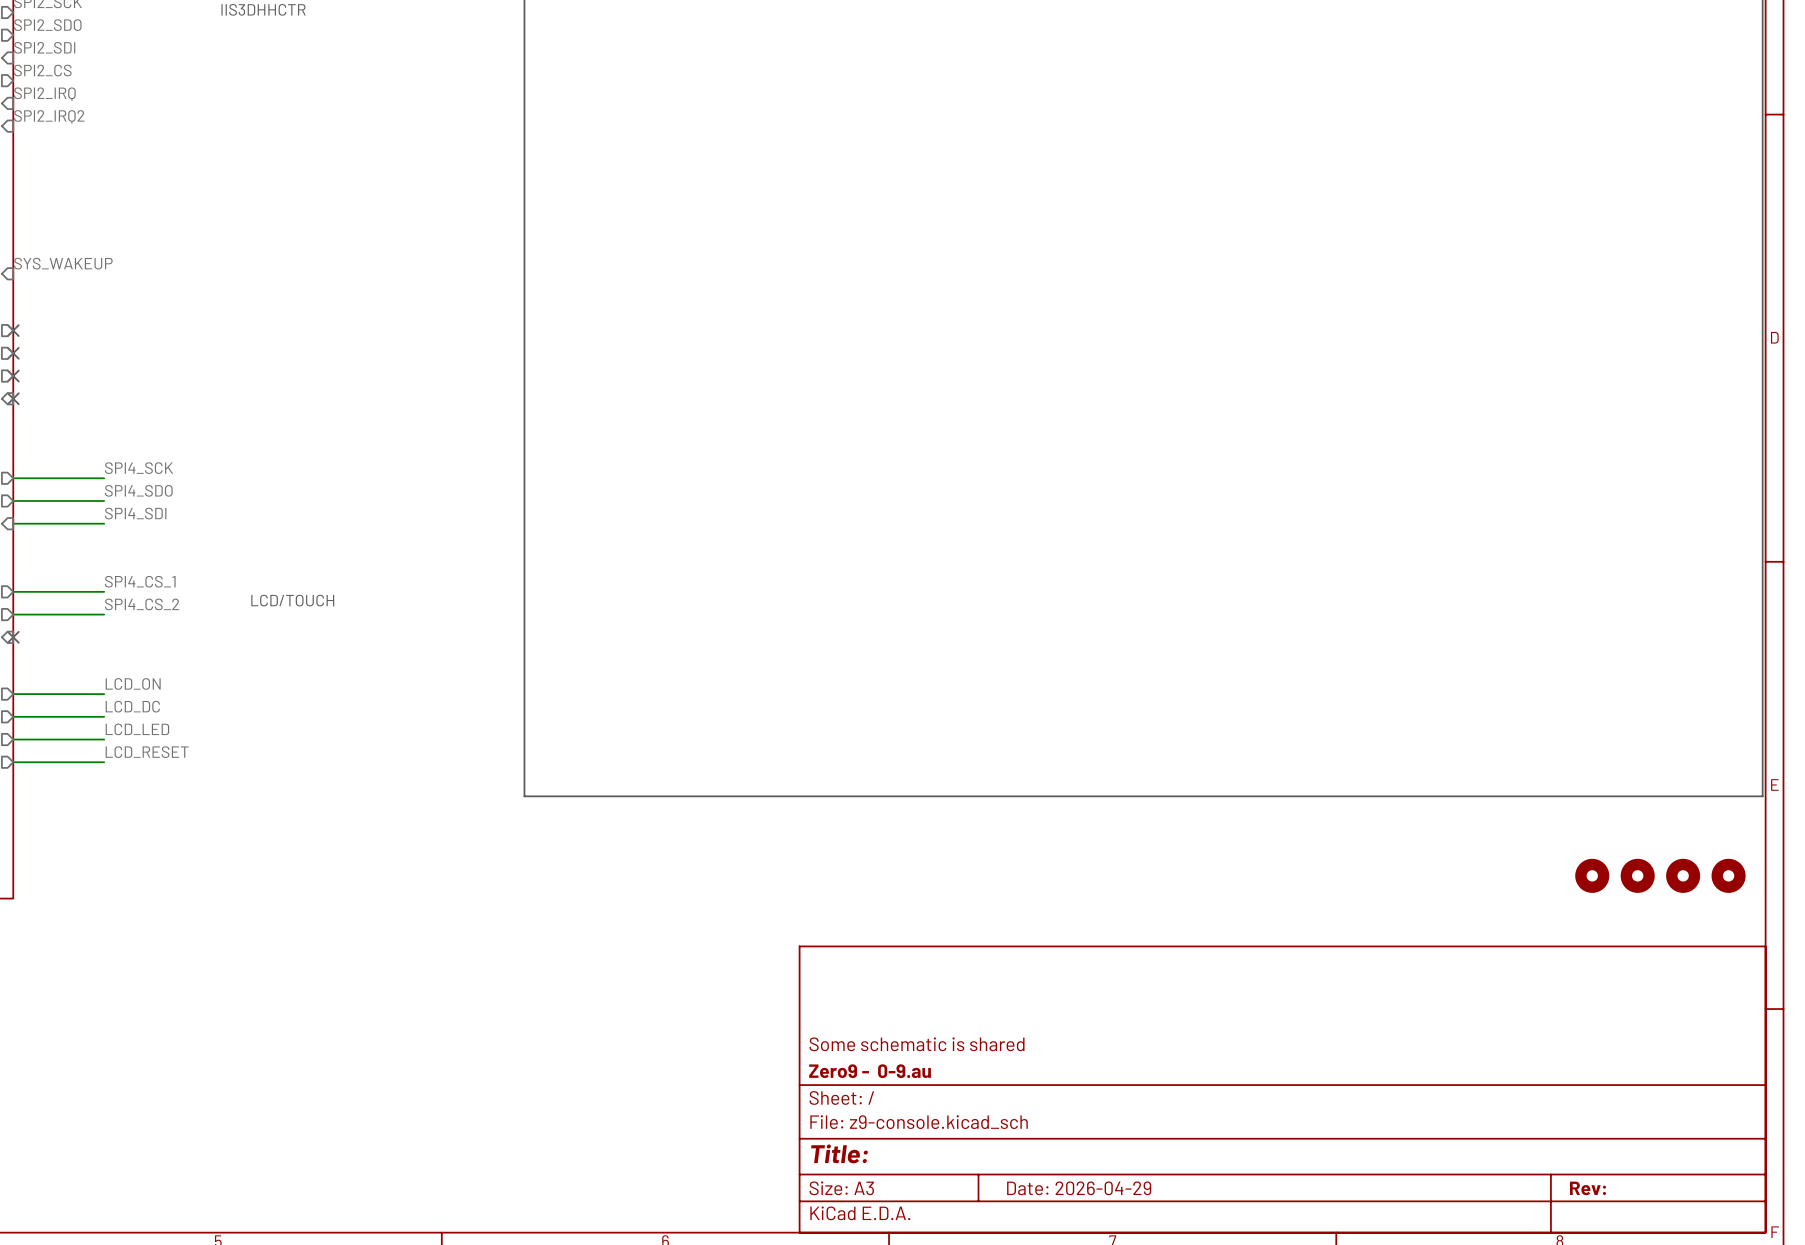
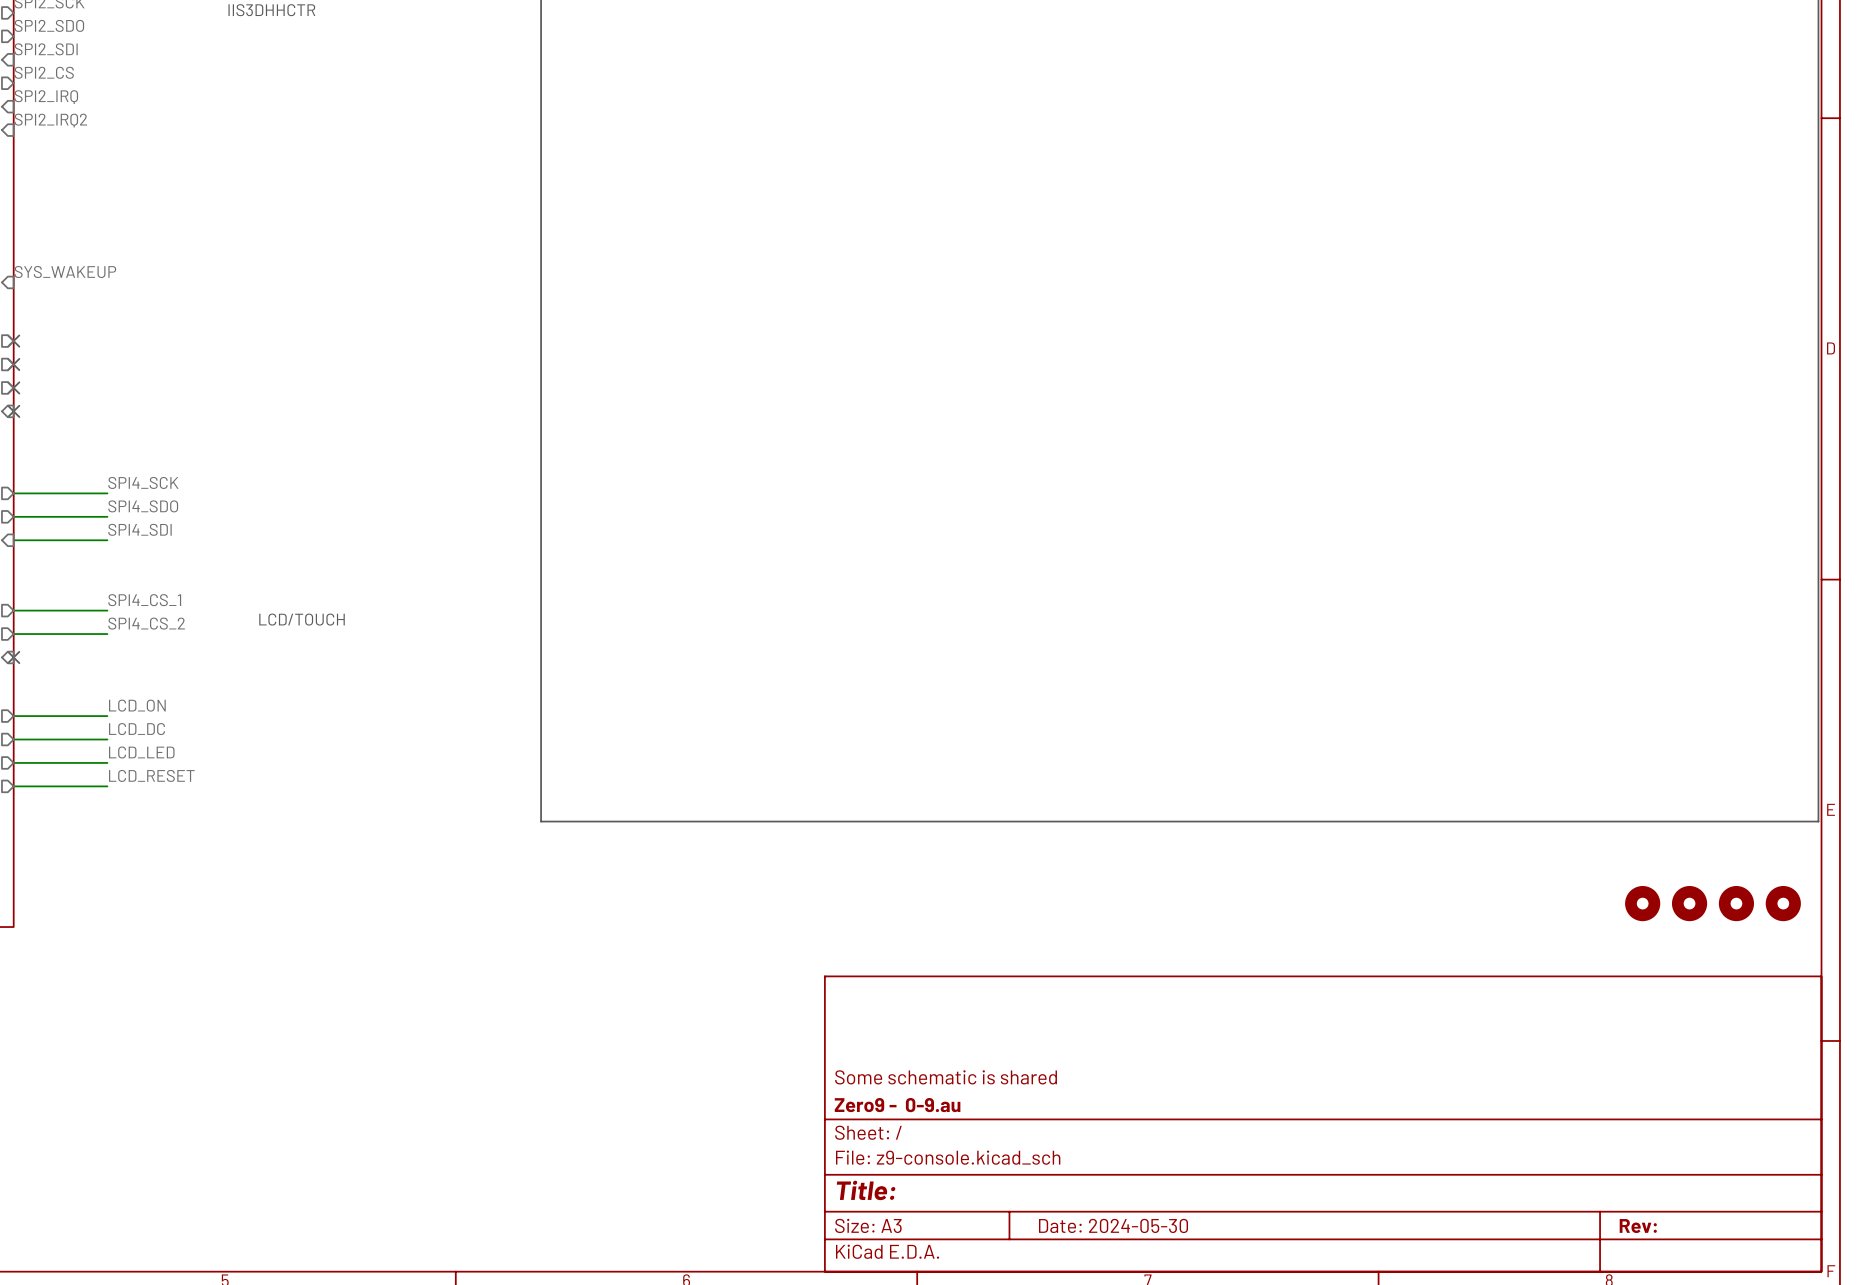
title block: Date: 2026-04-29 (1079, 1188) -> Date: 2024-05-30 (1113, 1225)

